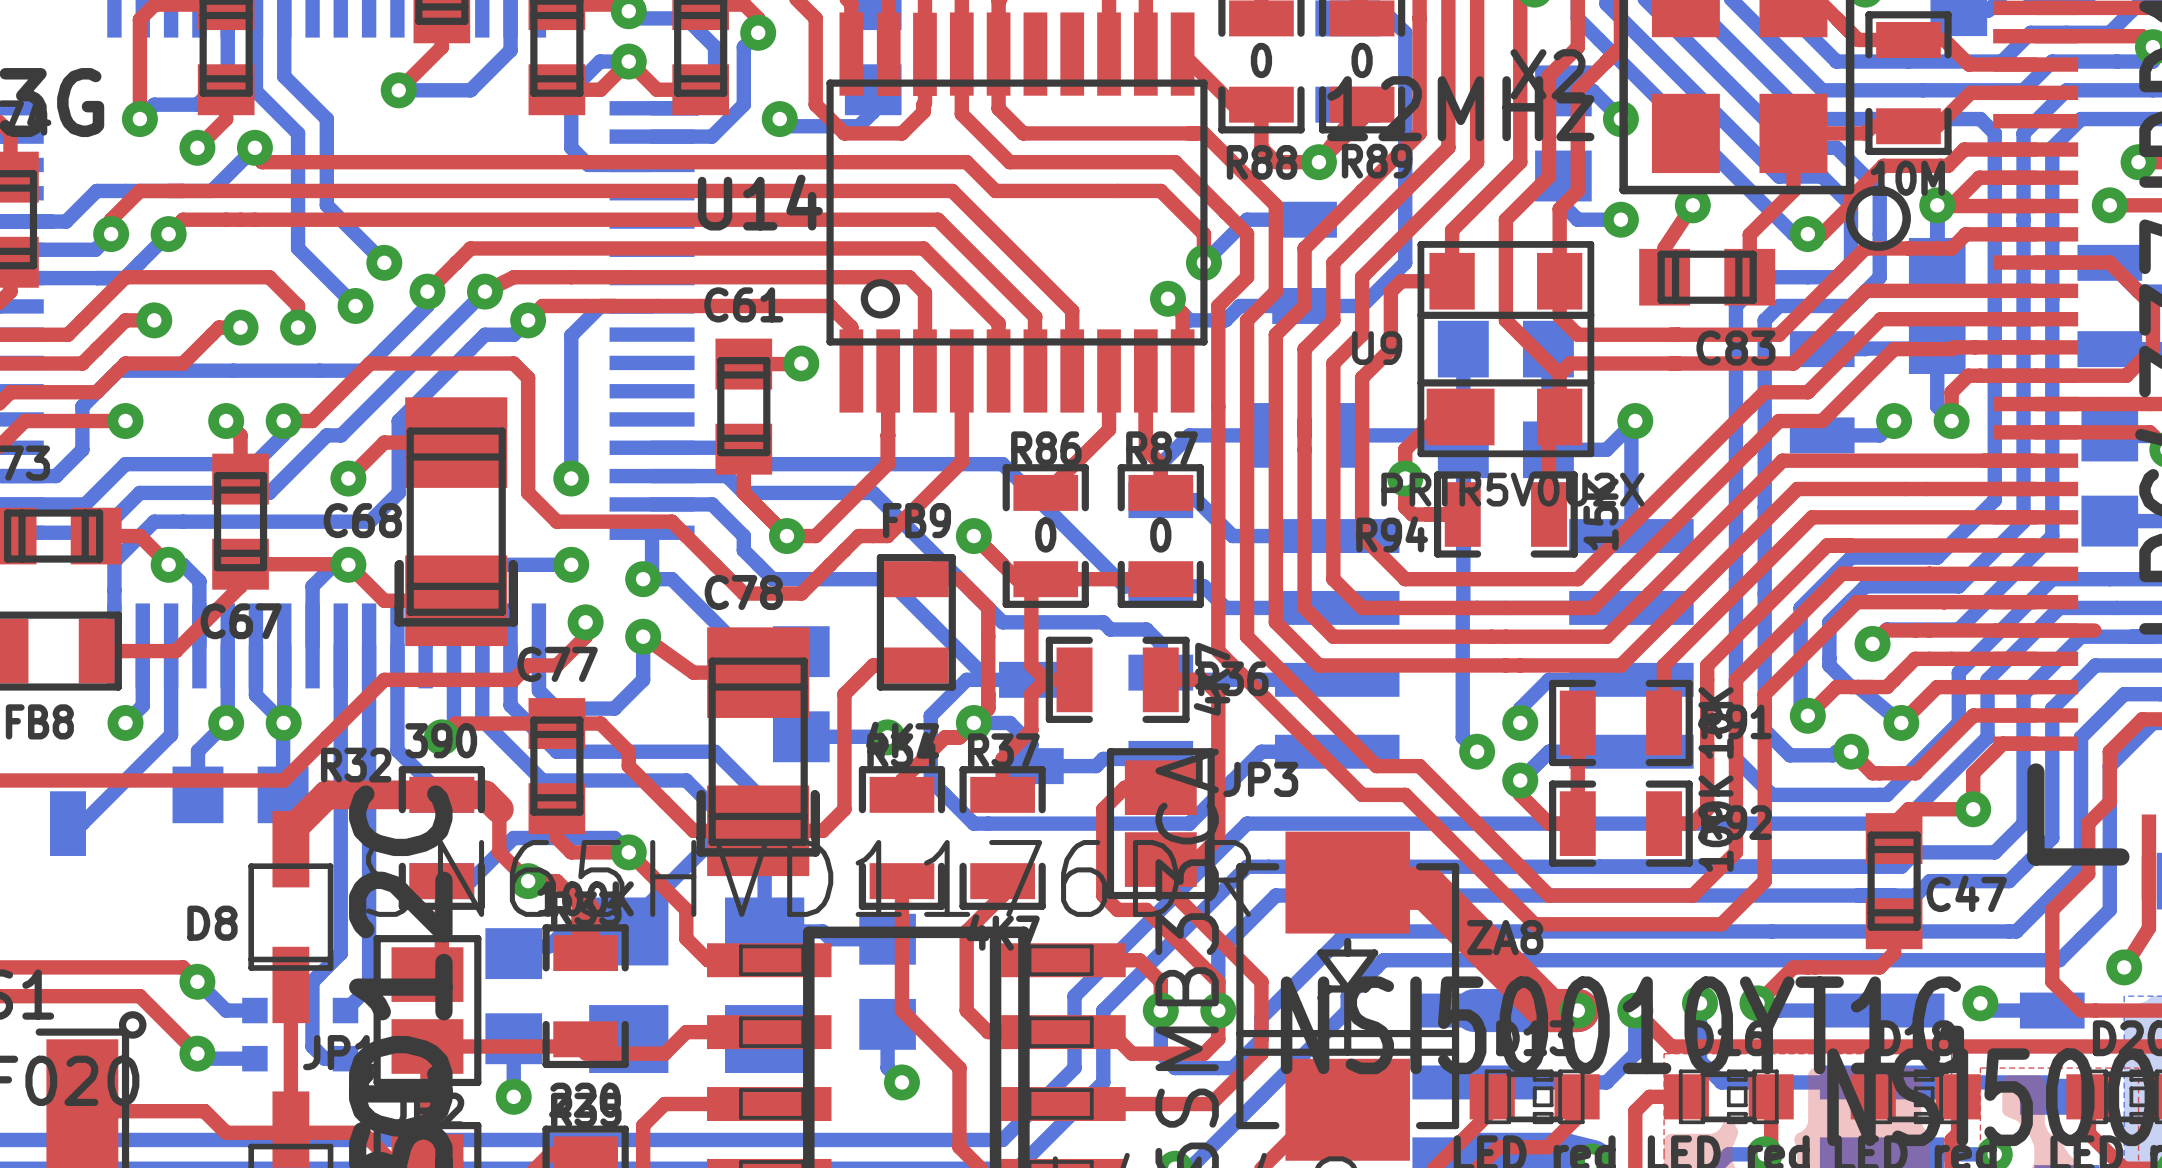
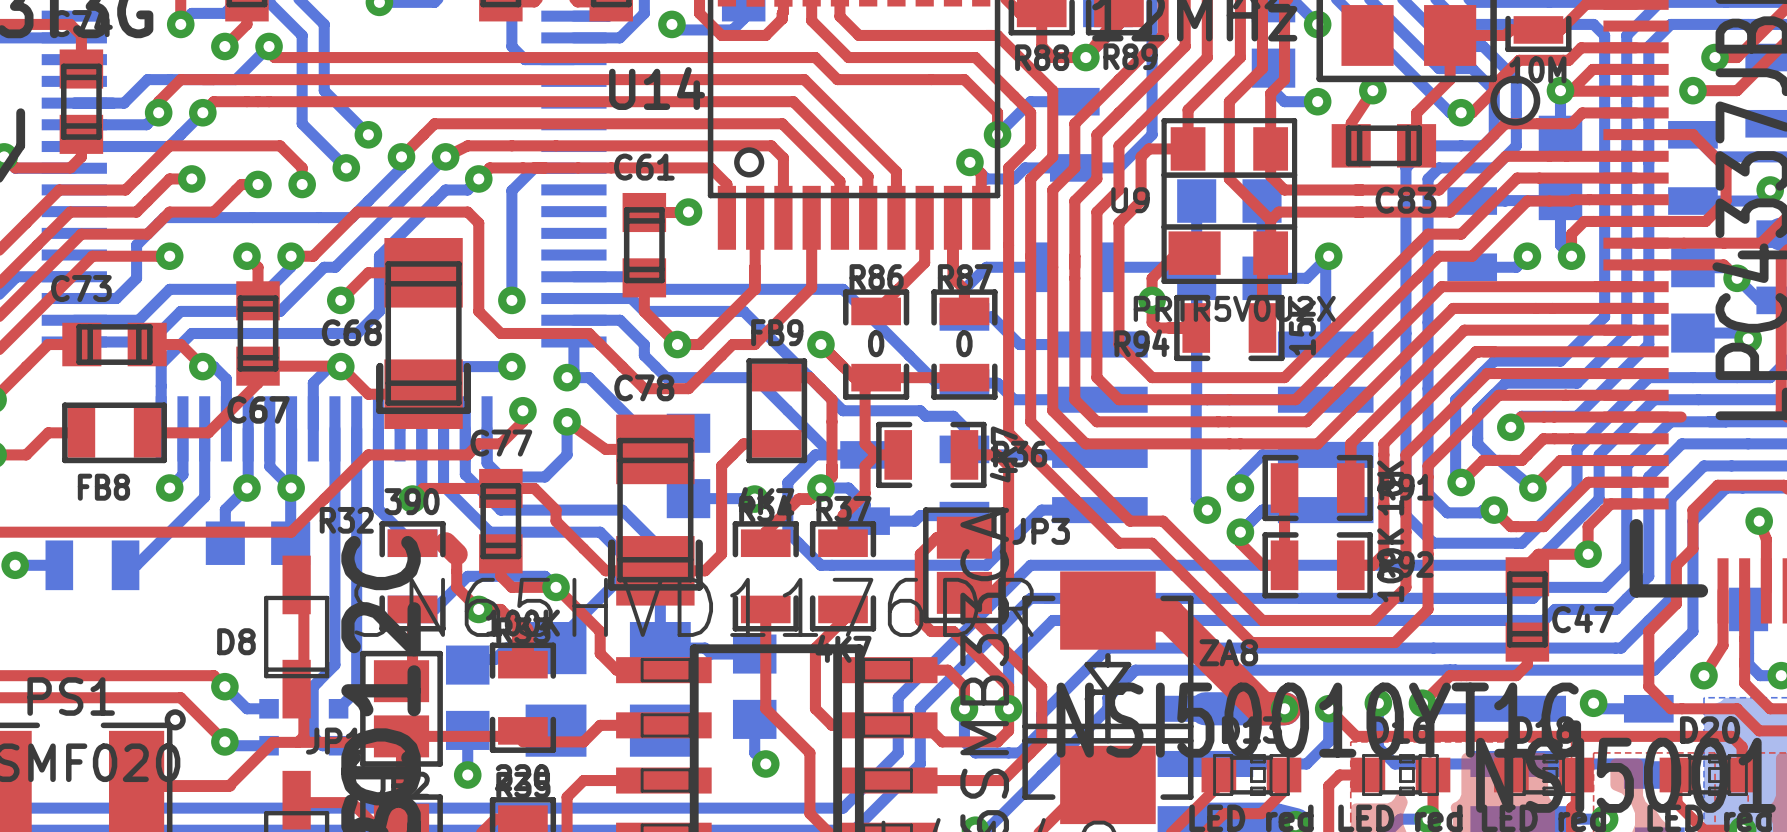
top track: (441, 794) (326, 794) (290, 830) (290, 849) -> none
top track: none -> (303, 601) (303, 736) (298, 742)
top track: (290, 984) (290, 1129) (287, 1132) (226, 1132) (204, 1111) -> (401, 736) (395, 742) (272, 742) (229, 786)

